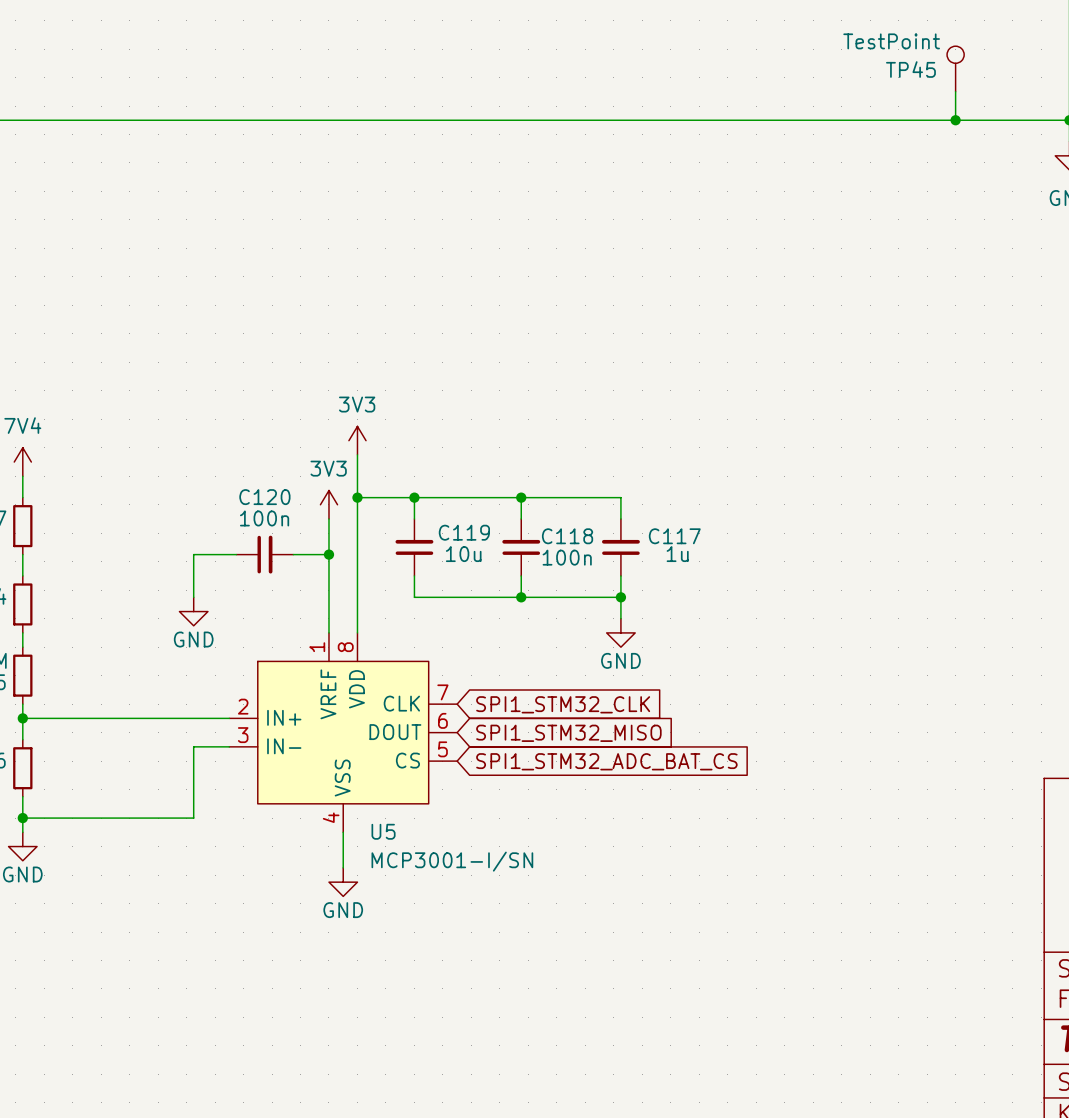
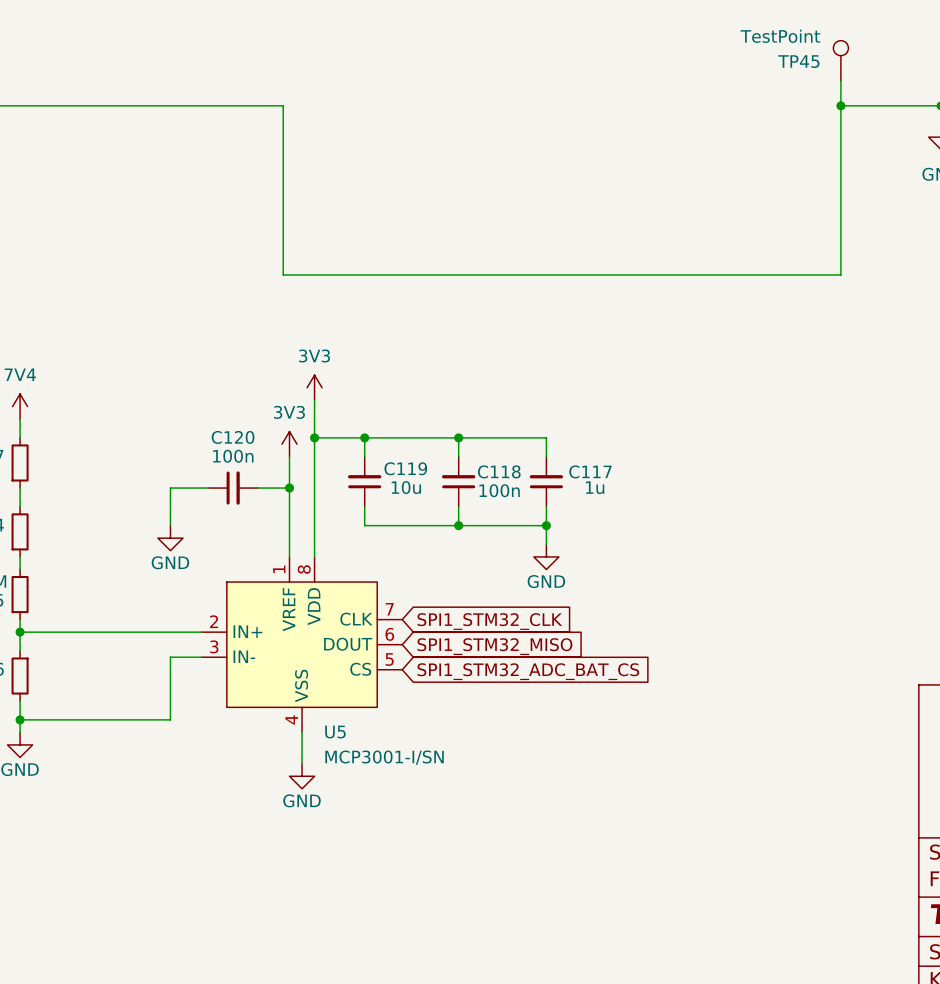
wire: (321, 120) (955, 120) -> (283, 105) (283, 274) (840, 274) (840, 105)

